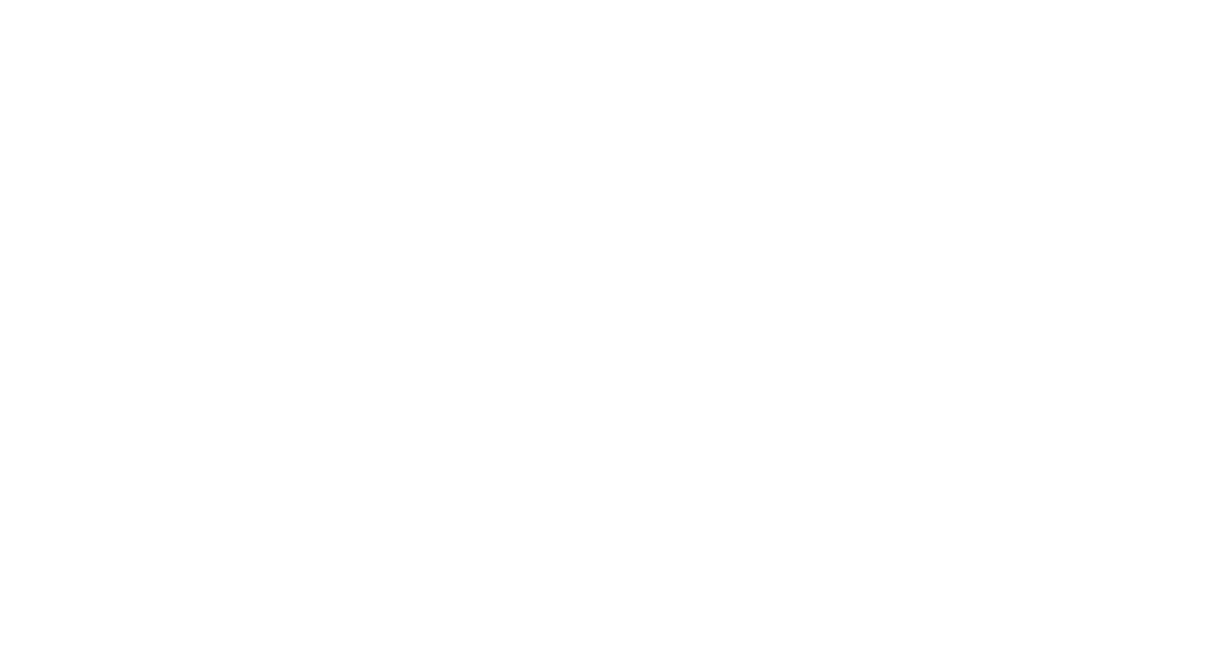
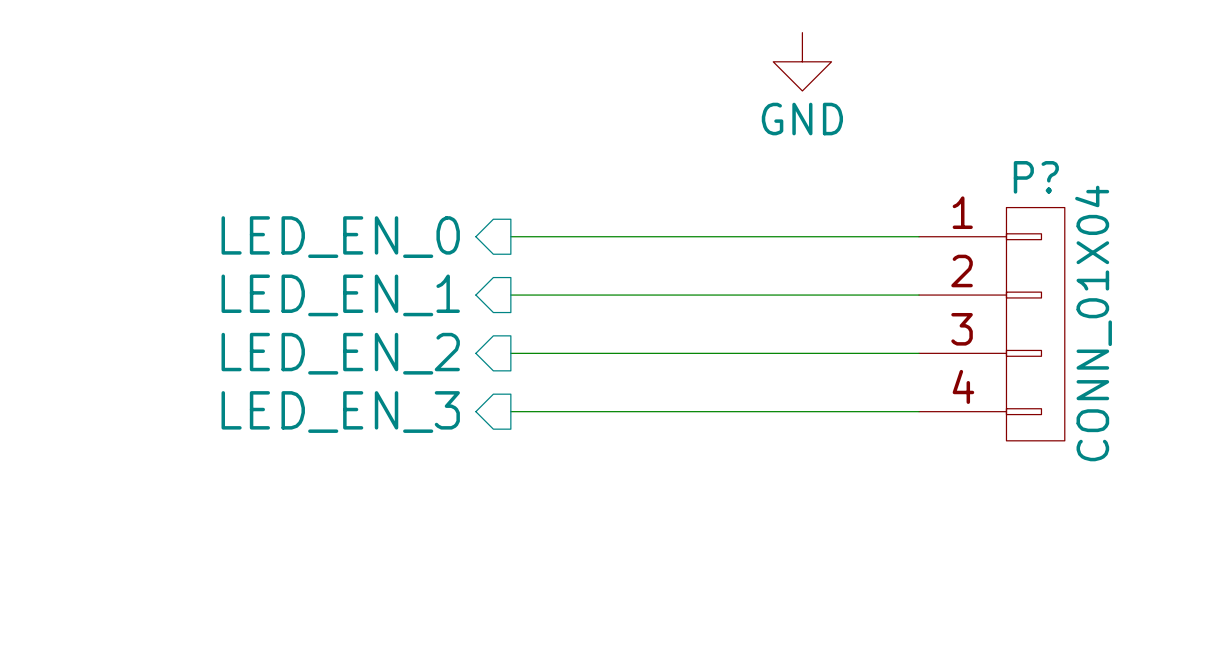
power symbol: none -> GND (802, 61)
wire: none -> (510, 236) (919, 236)
sheet pin: none -> LED_EN_0 (340, 237)
sheet pin: none -> LED_EN_1 (340, 295)
wire: none -> (510, 295) (919, 295)
P?: none -> CONN_01X04 (991, 324)
sheet pin: none -> LED_EN_2 (340, 353)
wire: none -> (510, 353) (919, 353)
wire: none -> (510, 411) (919, 411)
sheet pin: none -> LED_EN_3 (340, 412)

